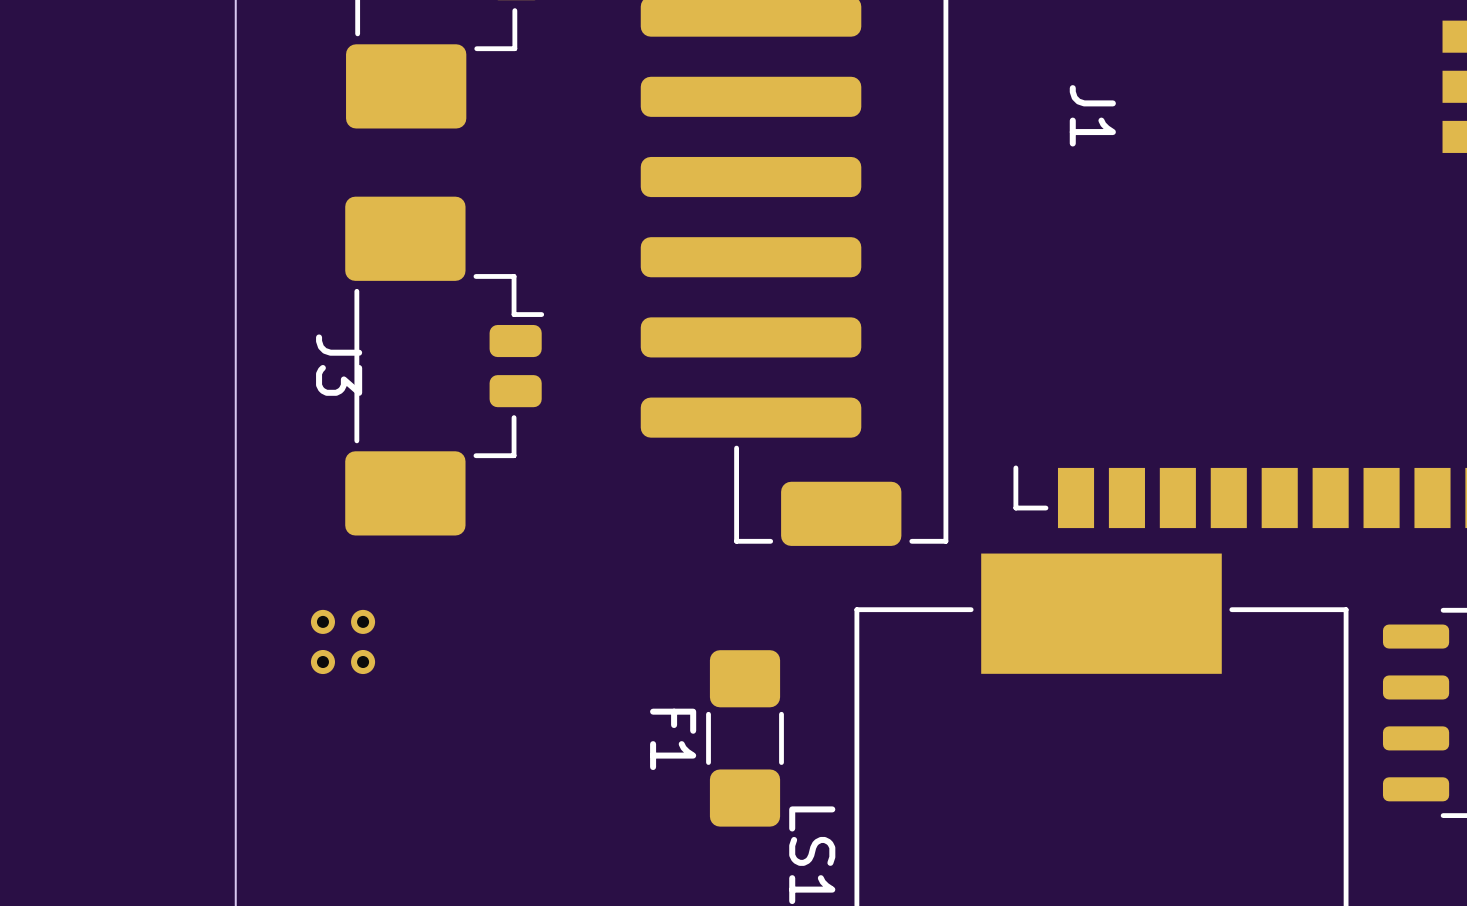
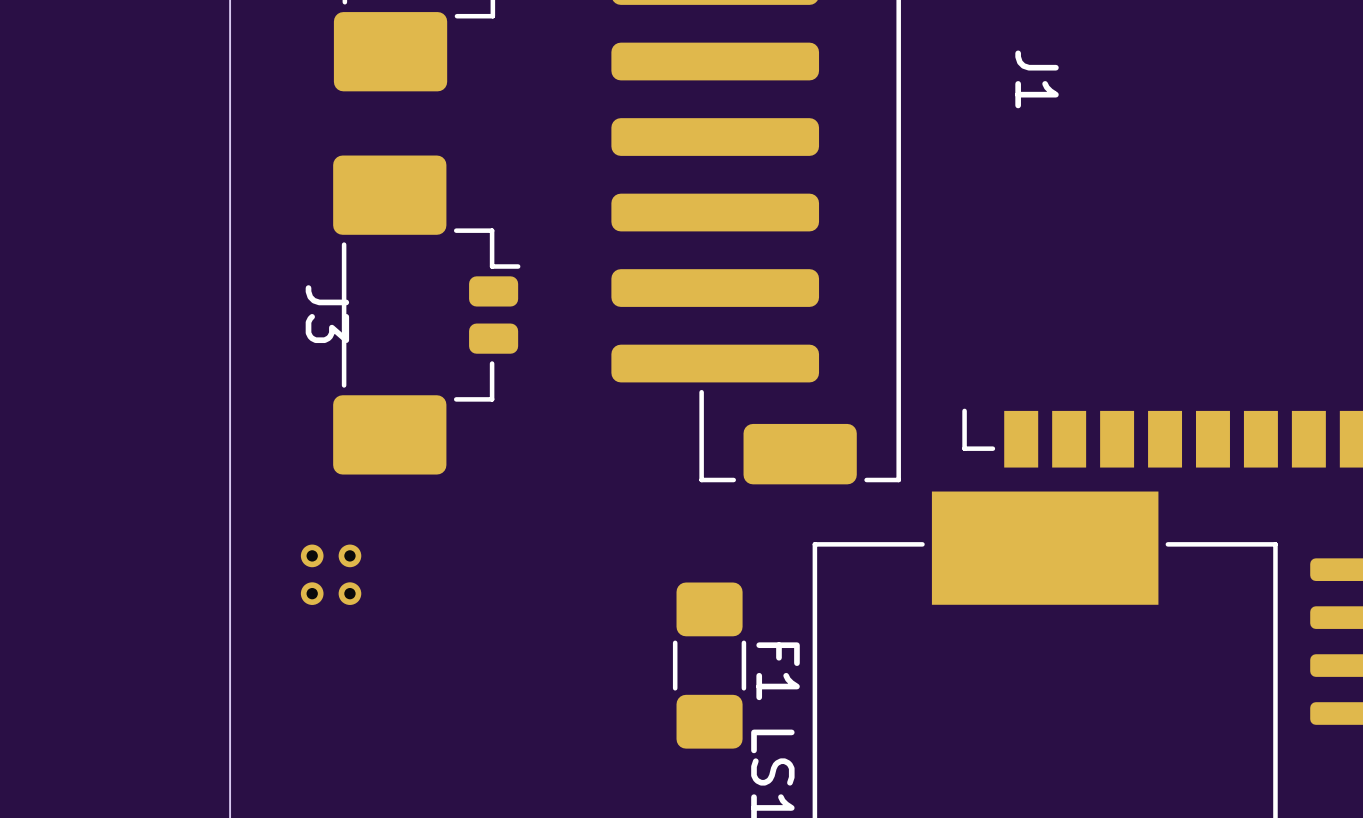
F1 name position: F1 (673, 739) -> F1 (778, 671)

